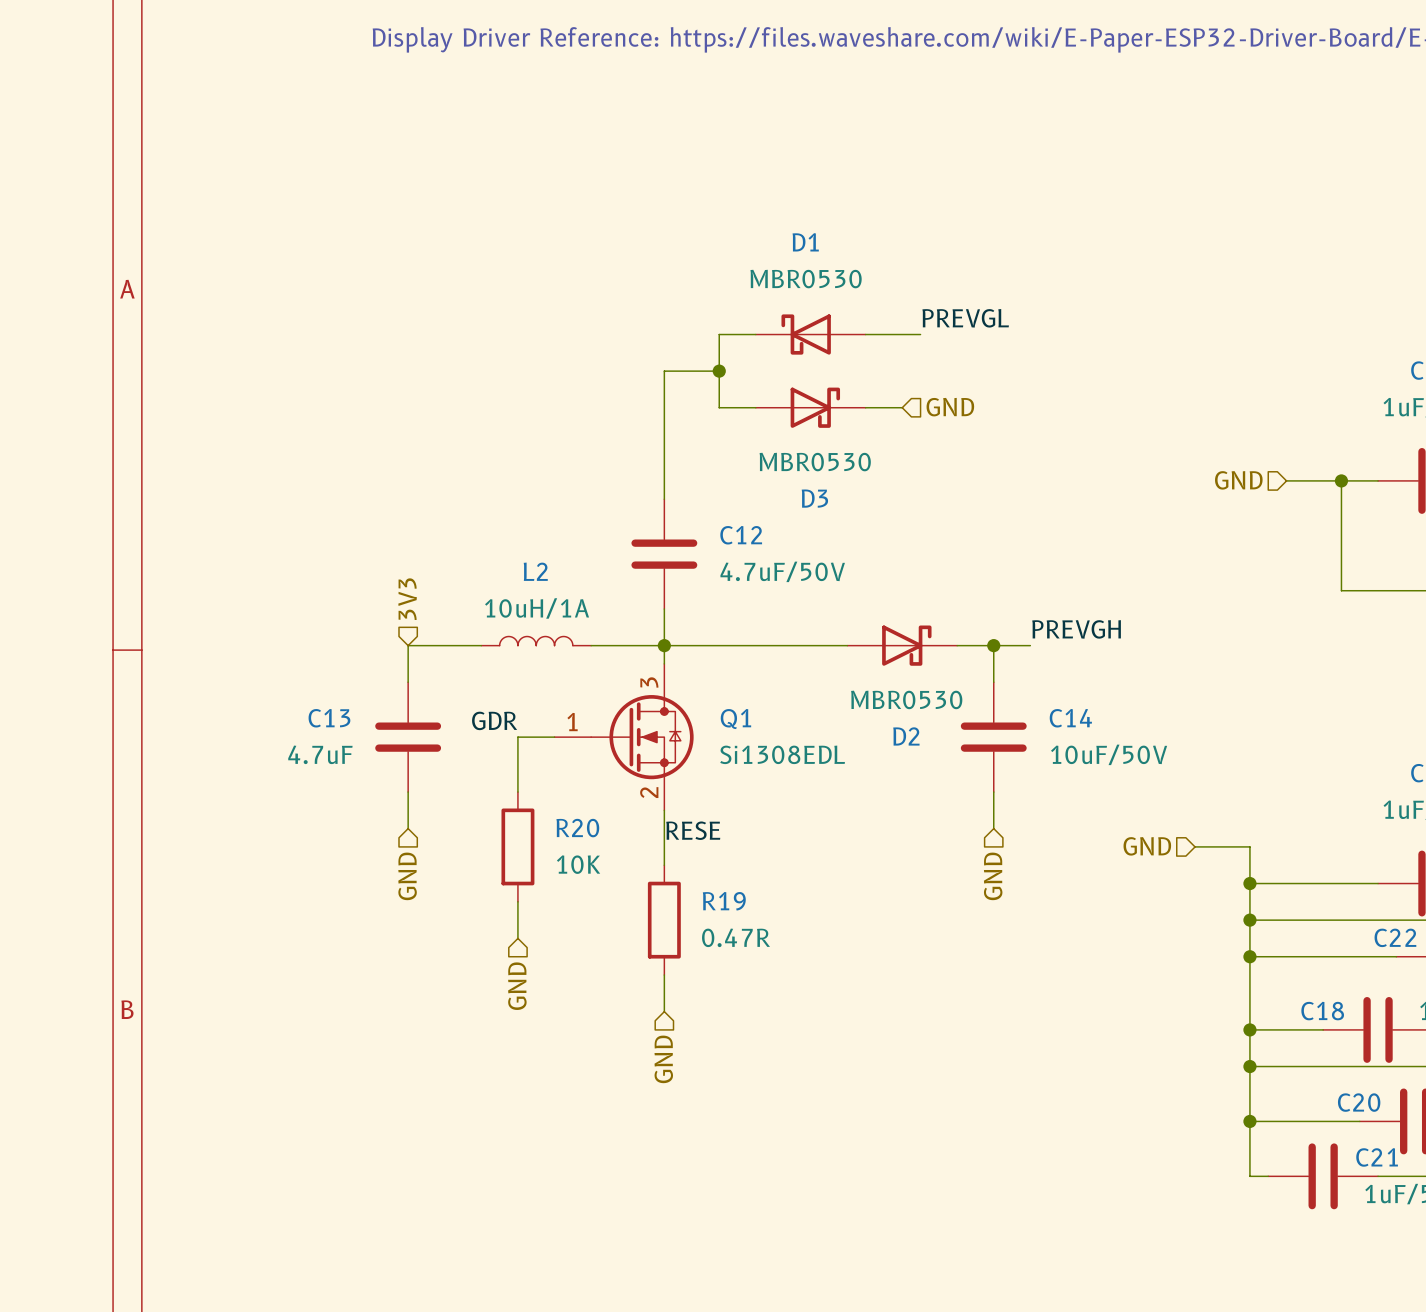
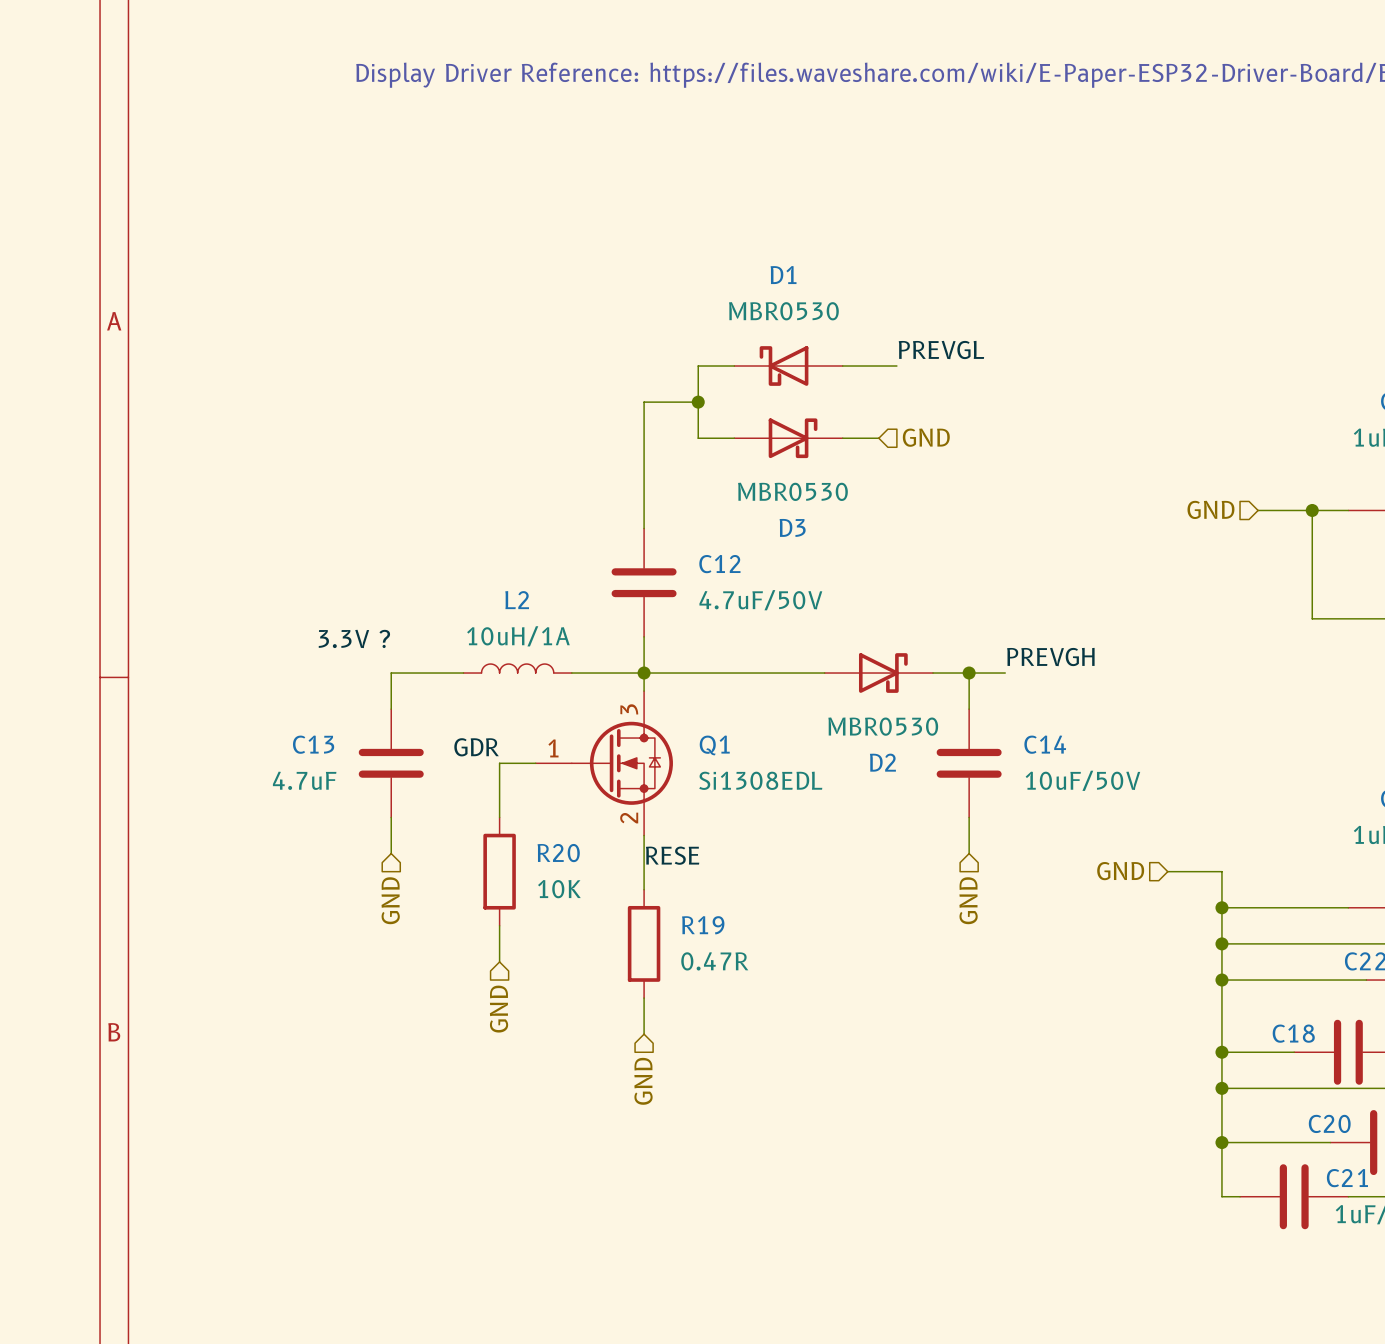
hierarchical label: 3V3 (407, 599) -> none
label: none -> 3.3V ? (354, 638)

